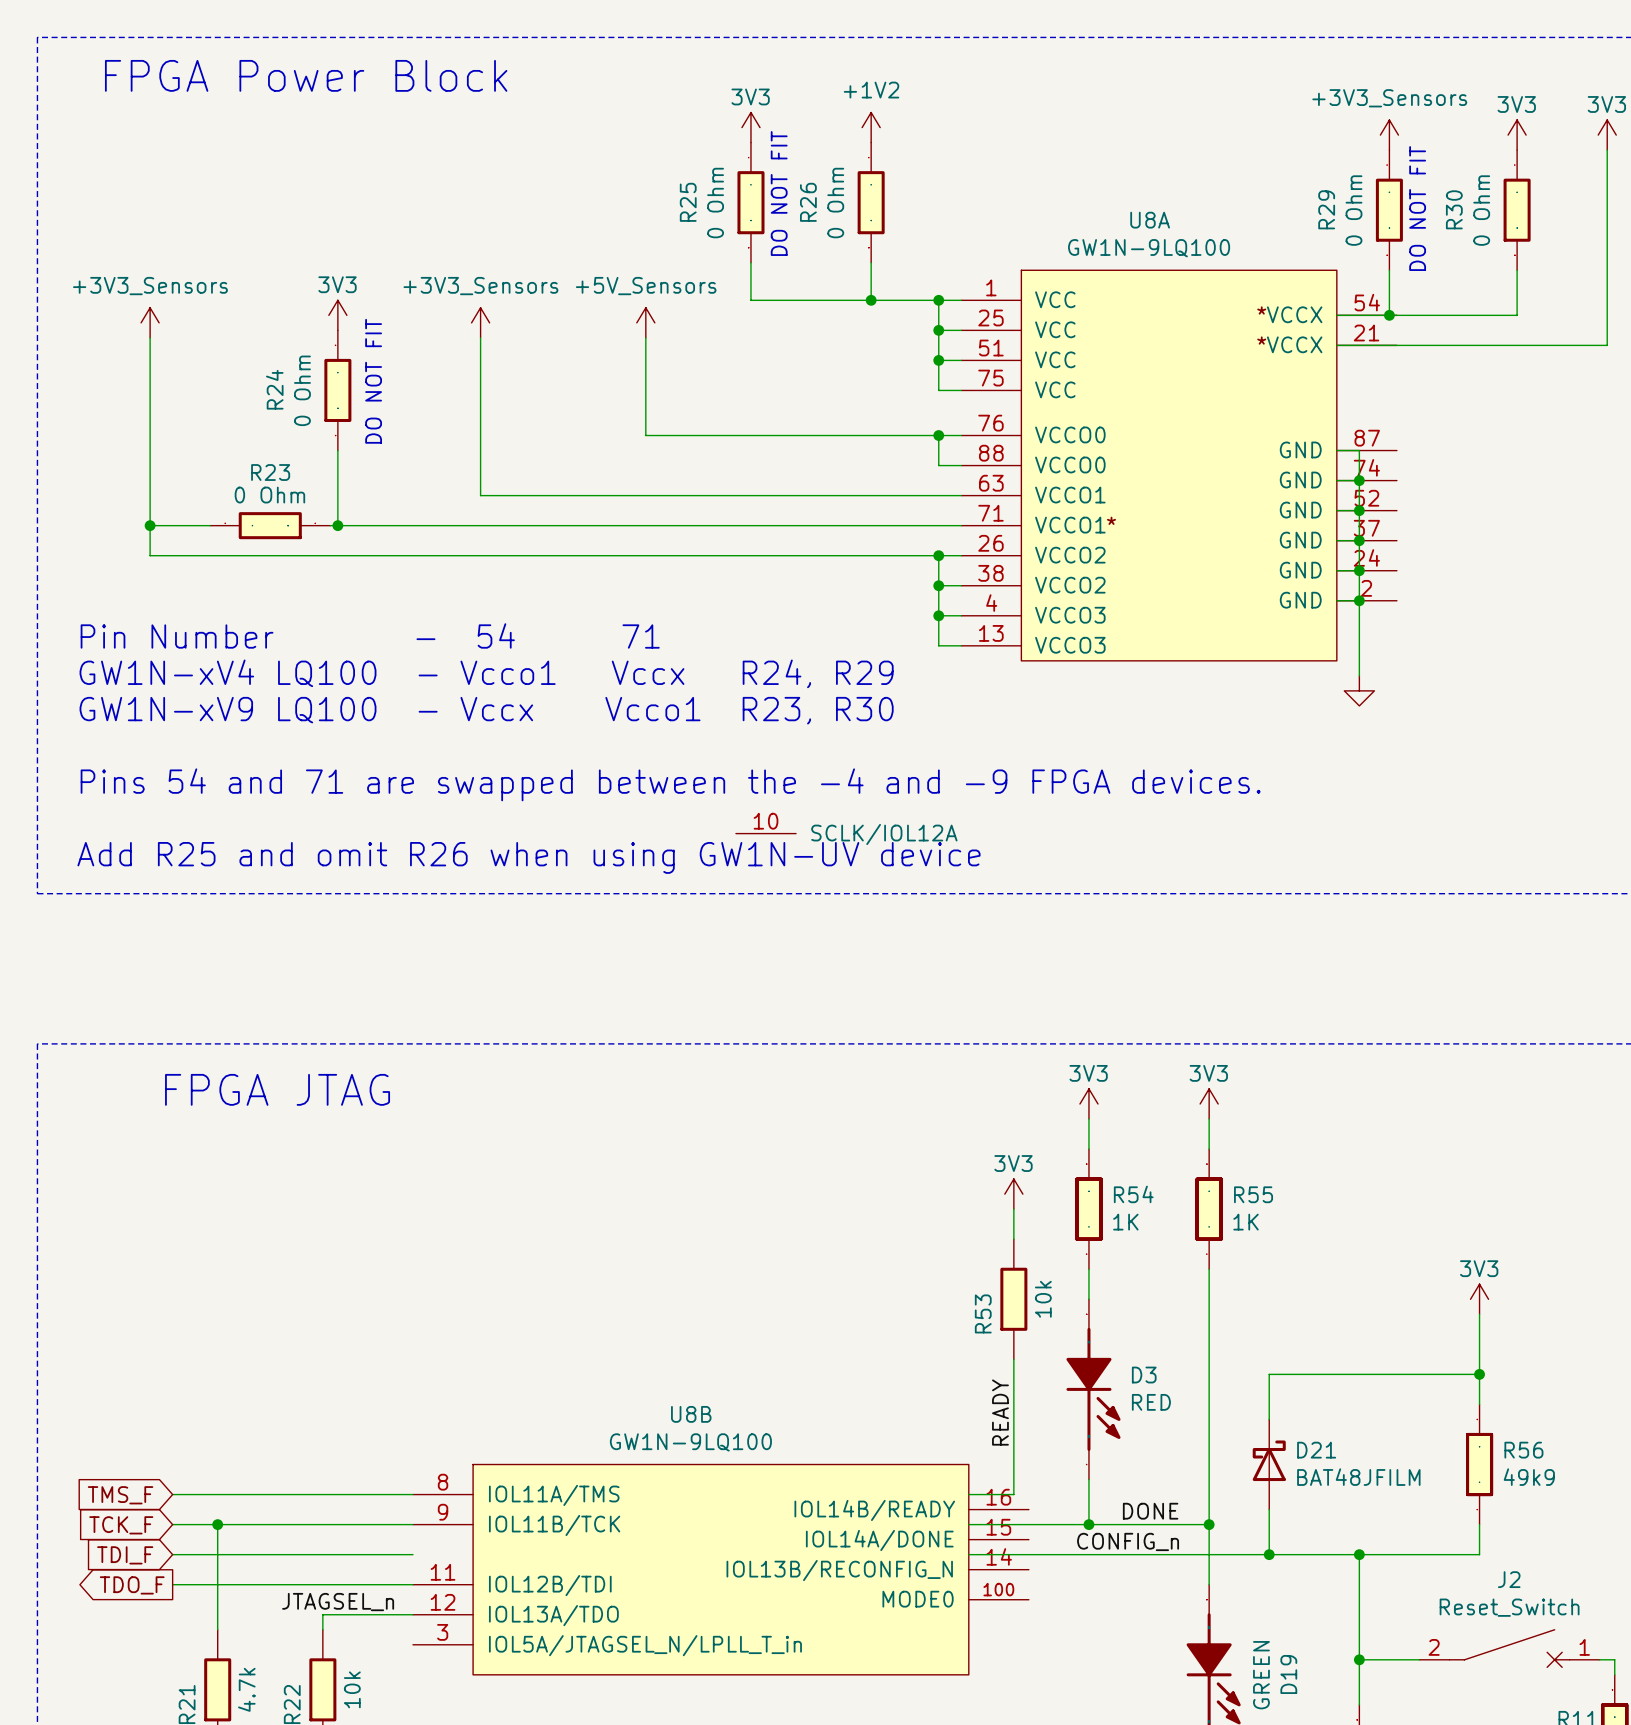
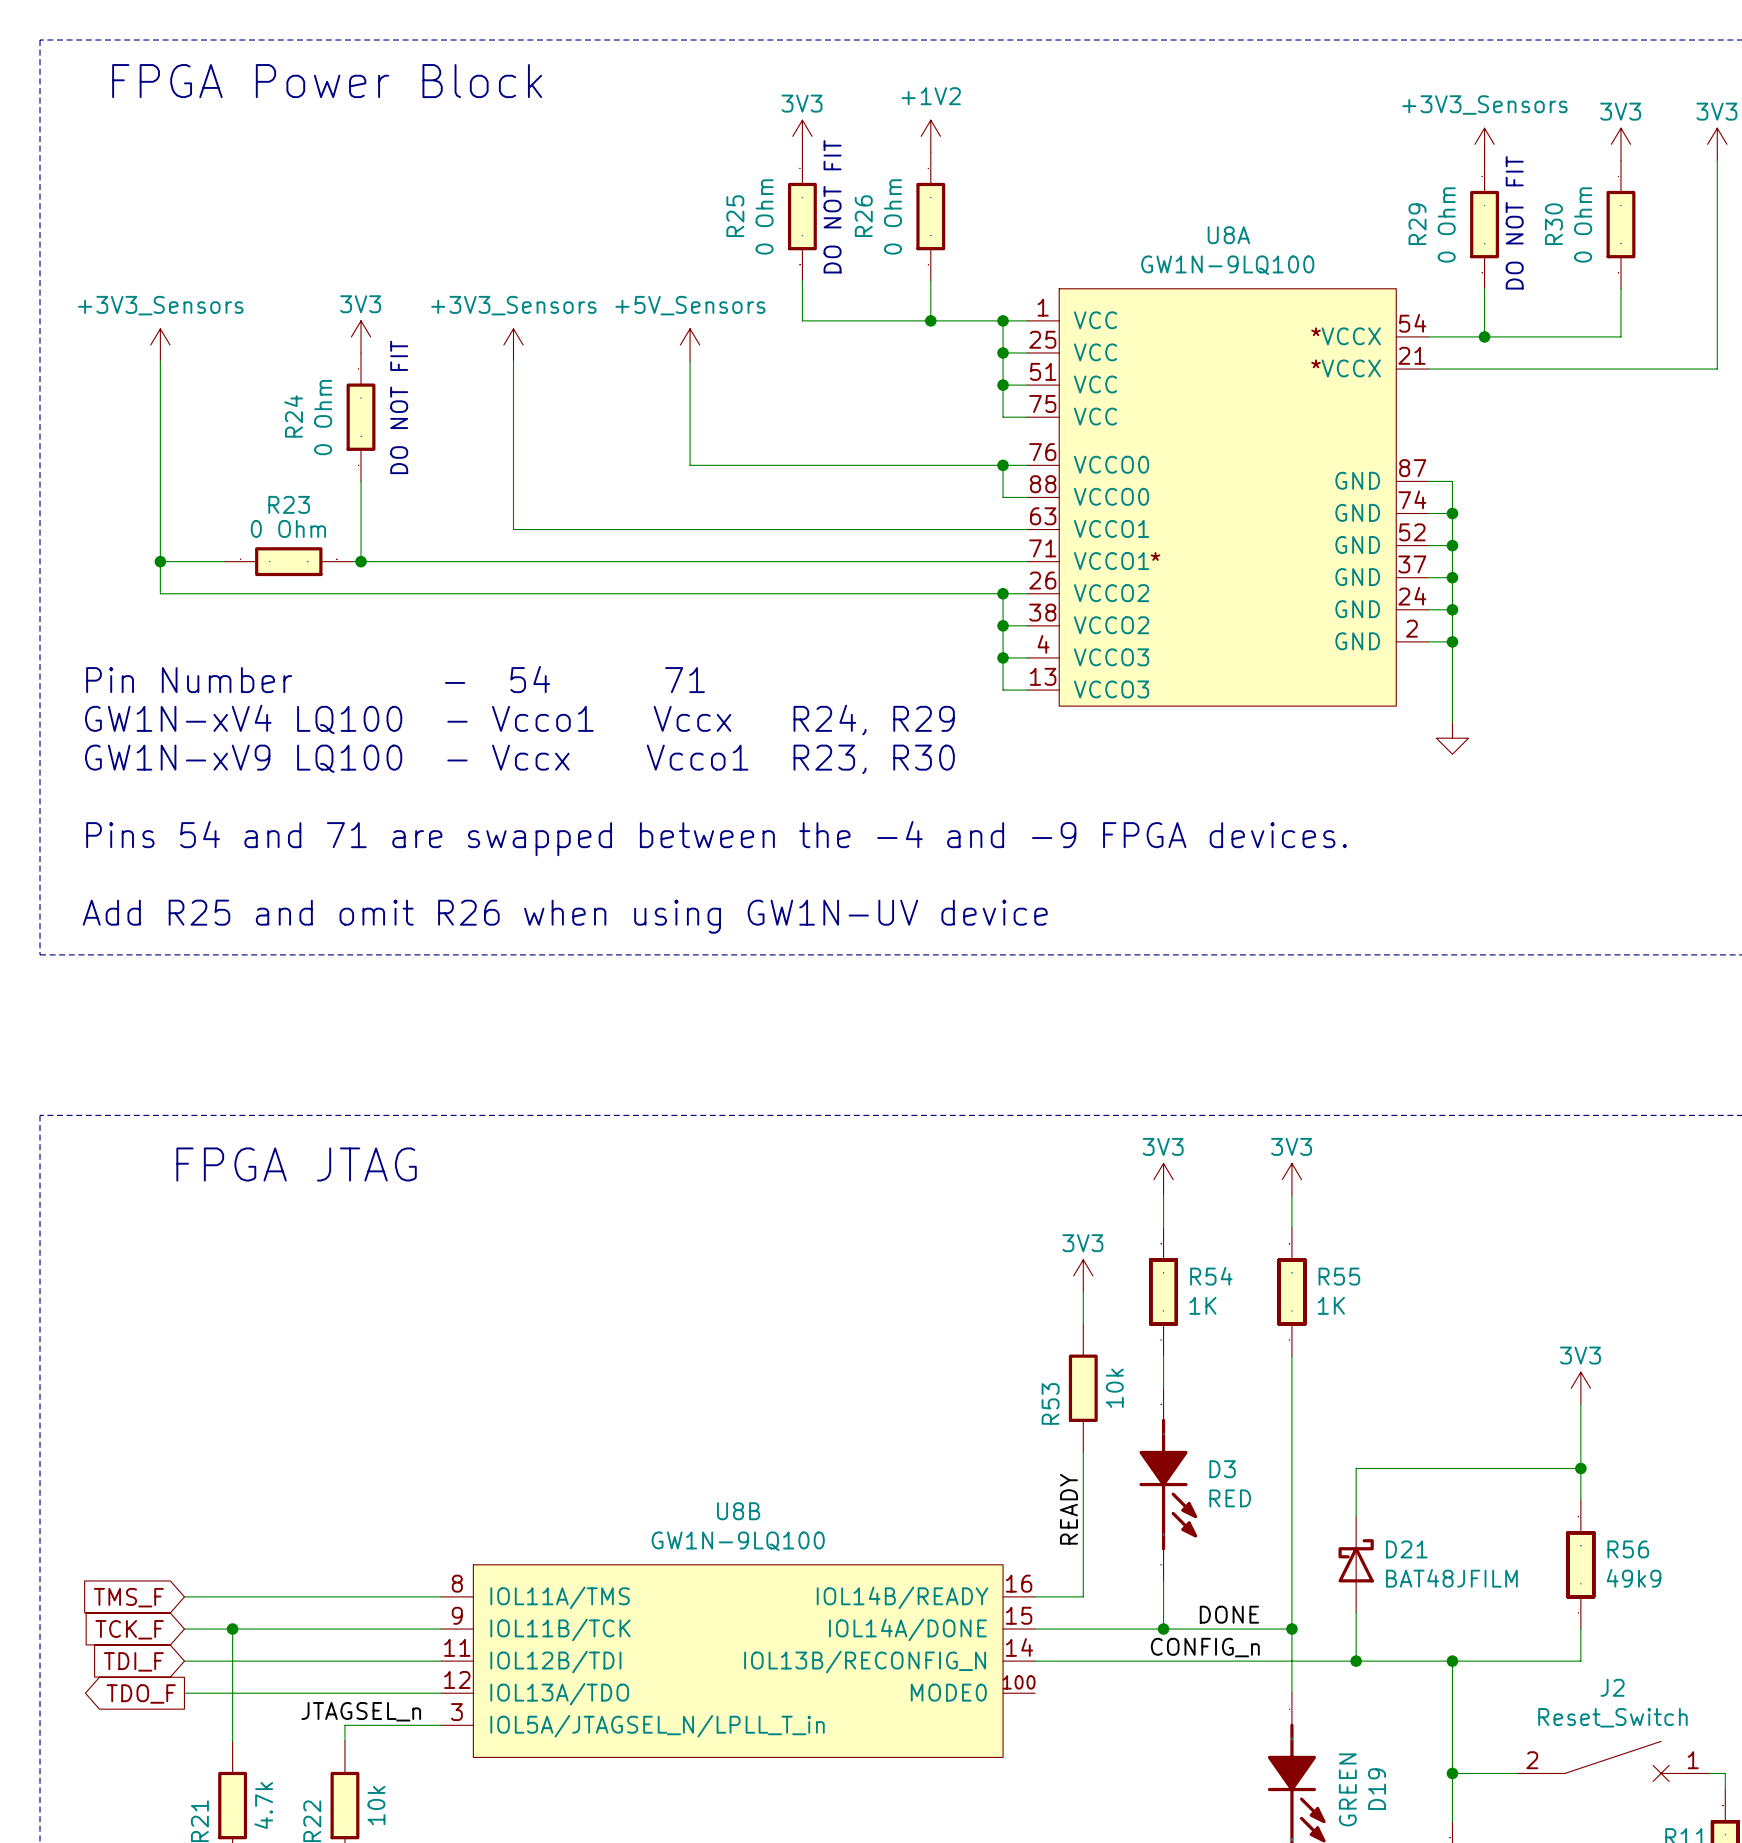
U8A symbol: [961, 270, 1397, 661] -> [1027, 288, 1429, 707]
U8B symbol: [412, 833, 1029, 1675] -> [441, 1564, 1036, 1758]

